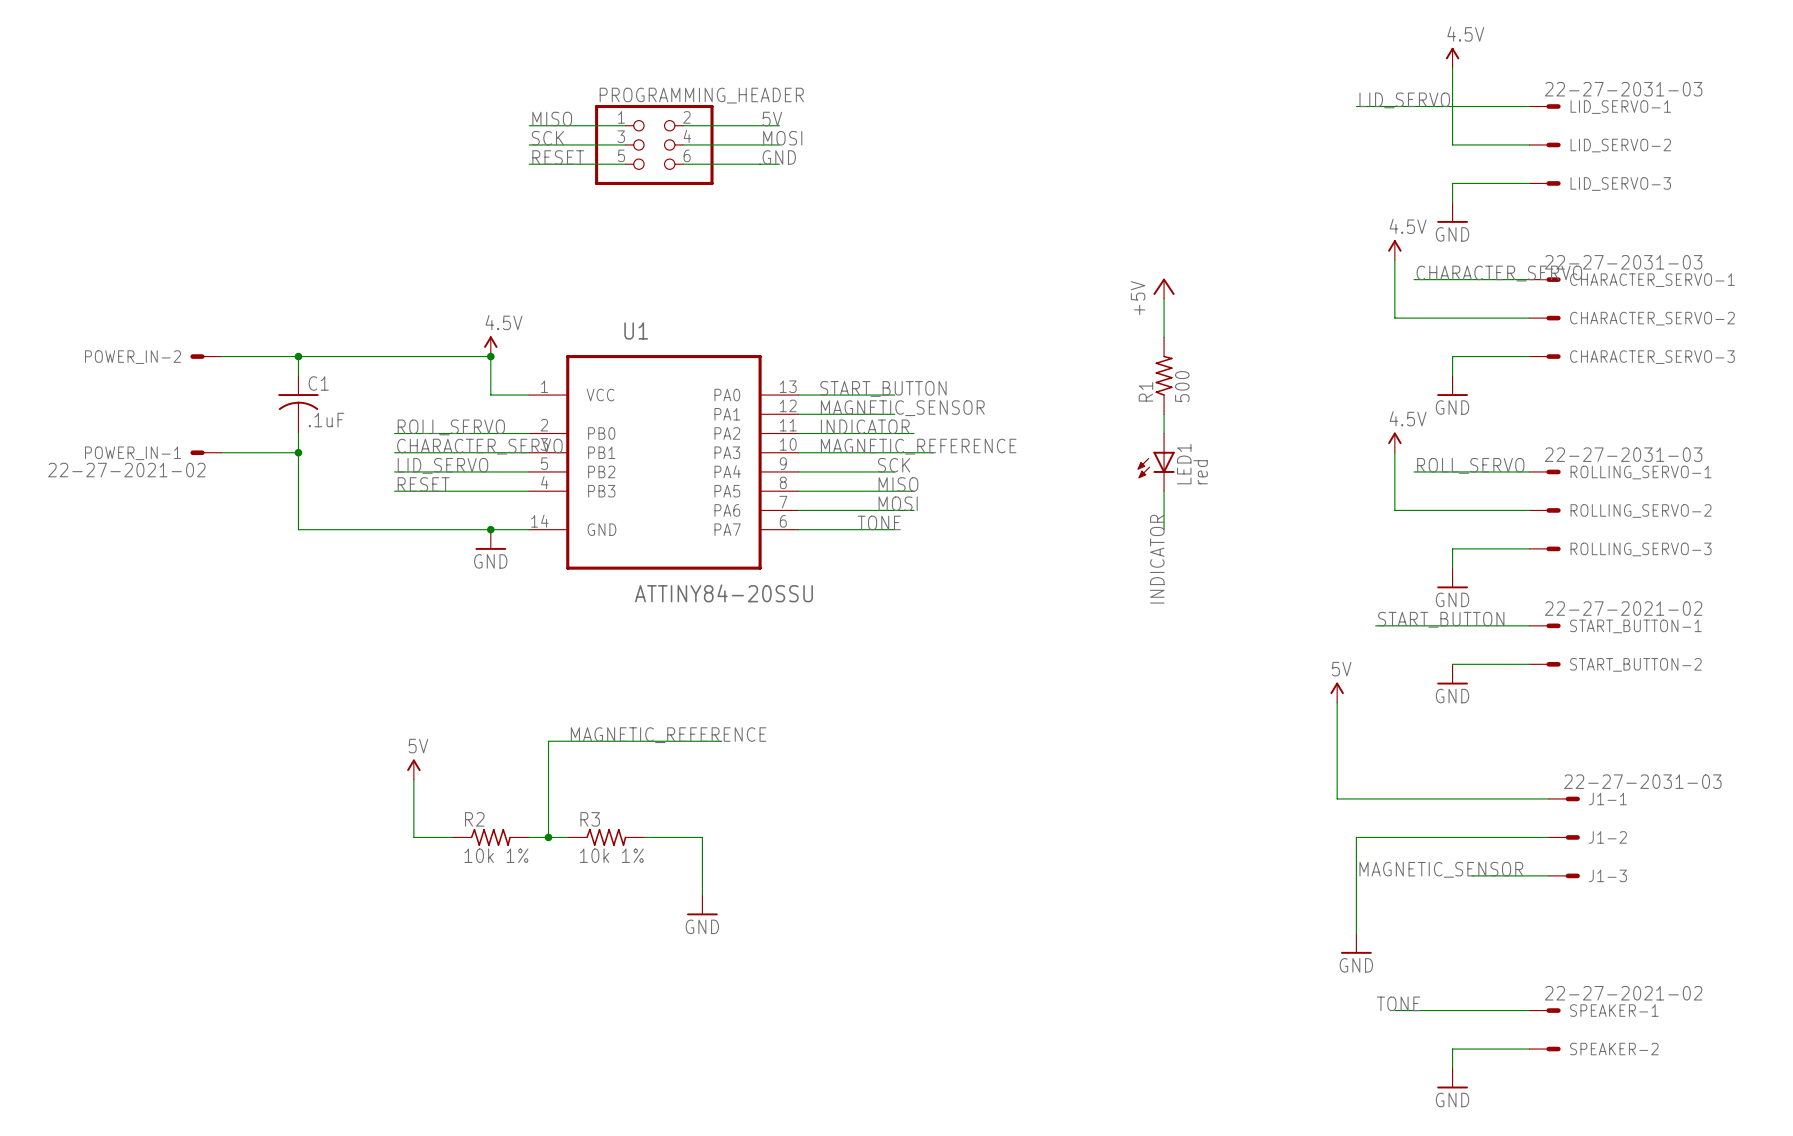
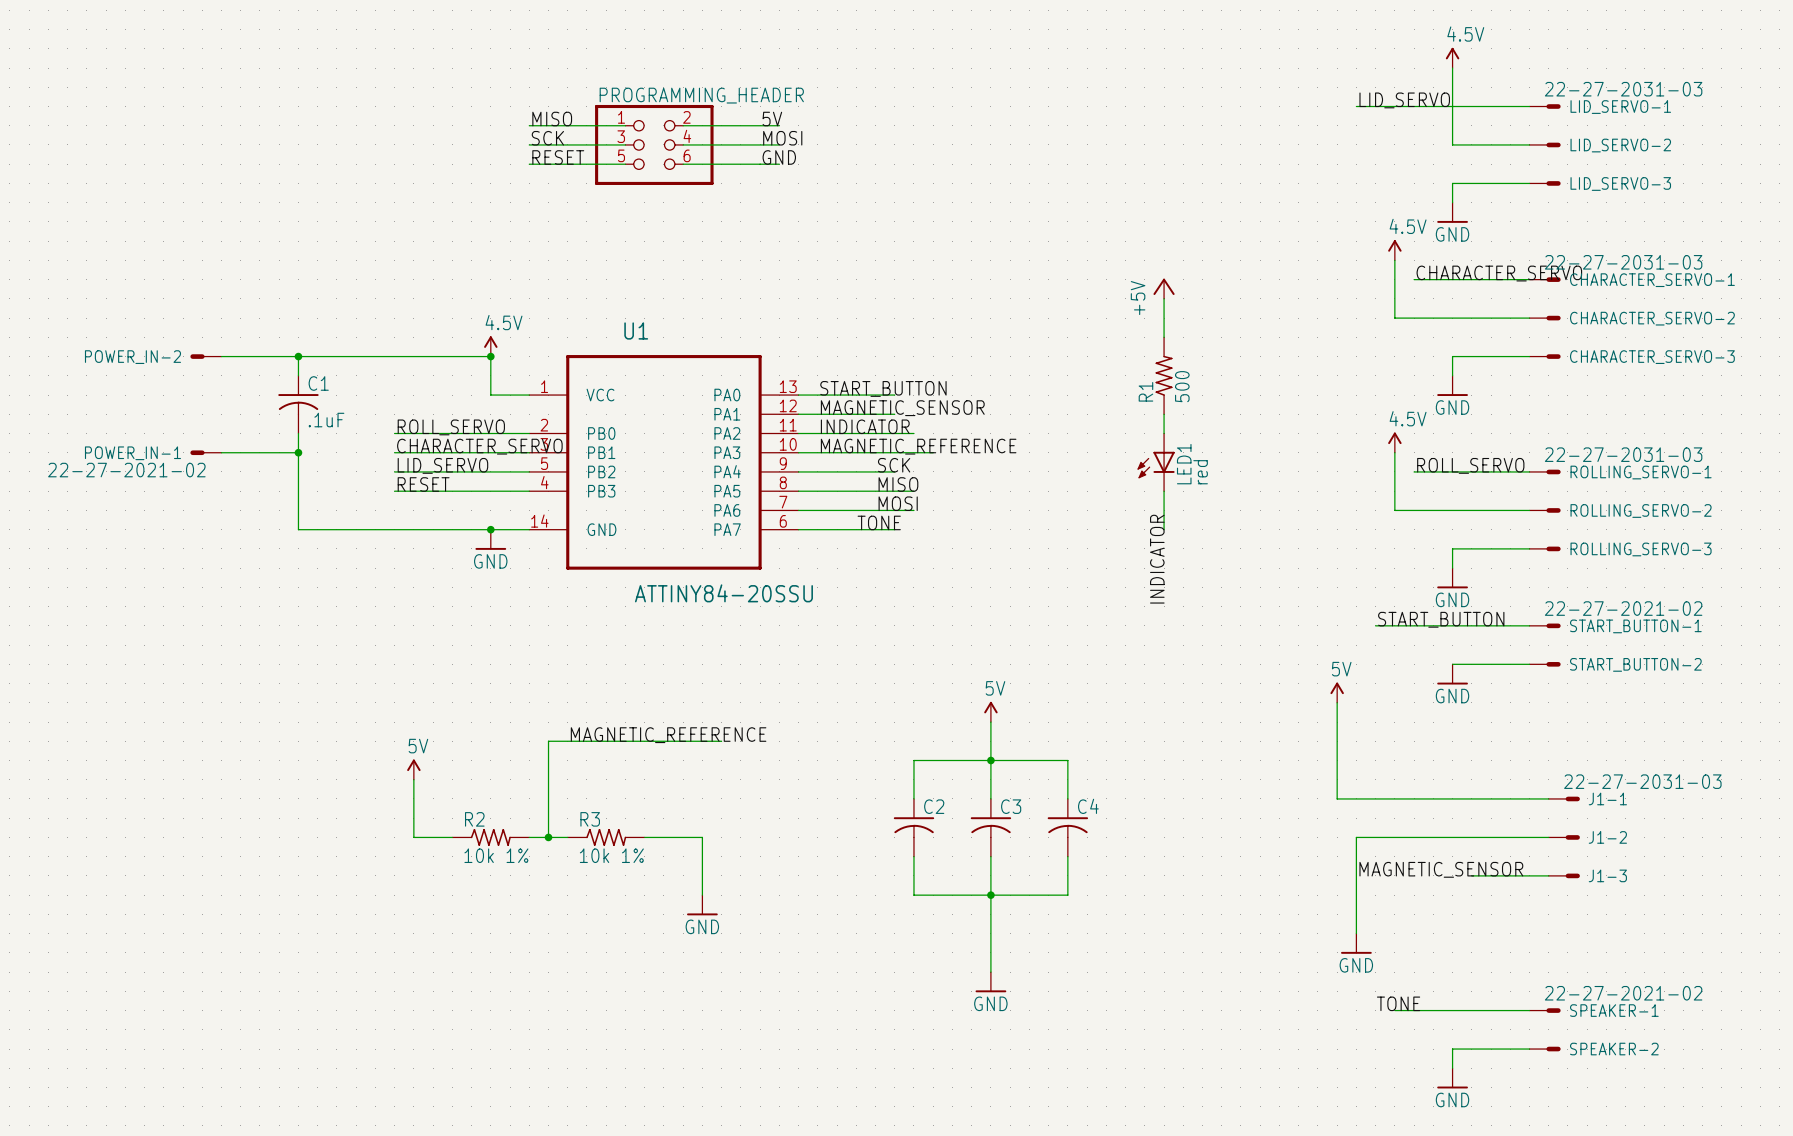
power symbol: none -> 5V (990, 711)
wire: none -> (990, 722) (990, 798)
junction: none -> (990, 760)
wire: none -> (913, 798) (913, 760) (1067, 760) (1067, 798)
C2: none -> (913, 827)
C3: none -> (990, 827)
C4: none -> (1067, 827)
wire: none -> (913, 856) (913, 895) (1067, 895) (1067, 856)
wire: none -> (990, 856) (990, 972)
junction: none -> (990, 895)
power symbol: none -> GND (990, 982)

